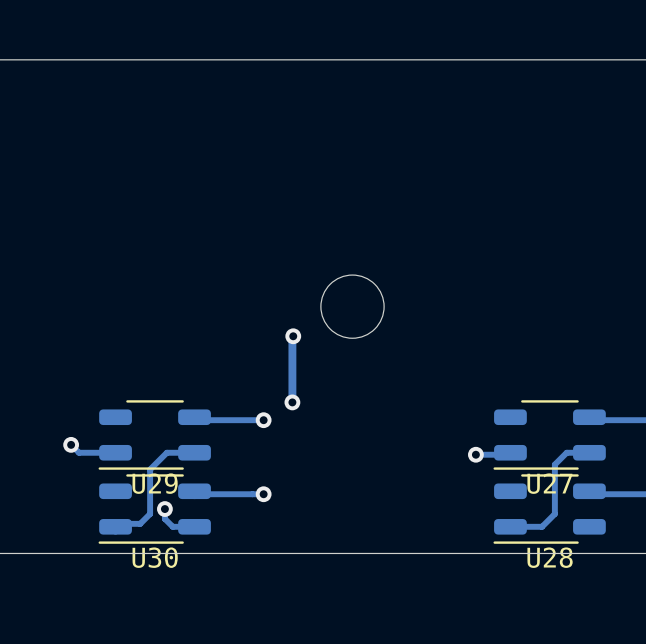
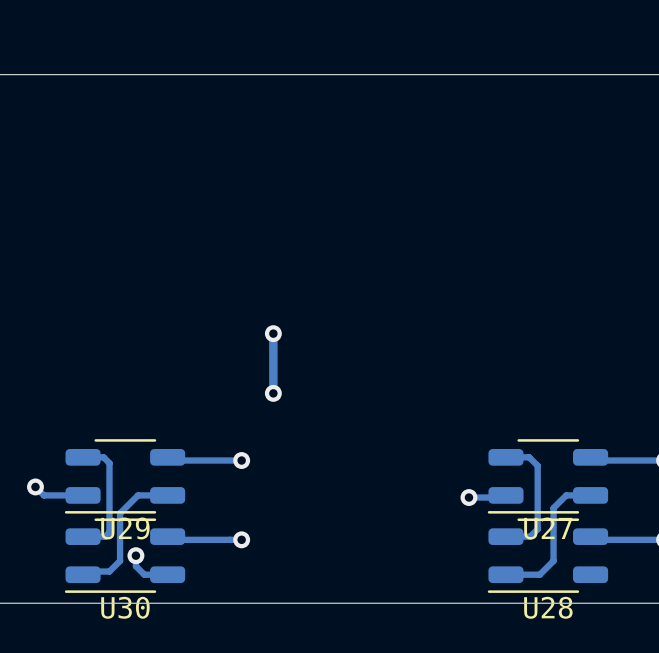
round board edge: [320, 274, 385, 339] -> none
track: none -> (273, 333) (273, 393)
via: none -> (273, 333)
track: (293, 336) (292, 402) -> none
via: (293, 336) -> none
via: none -> (273, 393)
via: (292, 402) -> none
track: none -> (83, 457) (103, 457) (109, 463) (109, 532) (105, 536) (83, 536)
track: none -> (505, 457) (529, 457) (537, 465) (537, 529) (530, 536) (505, 536)

